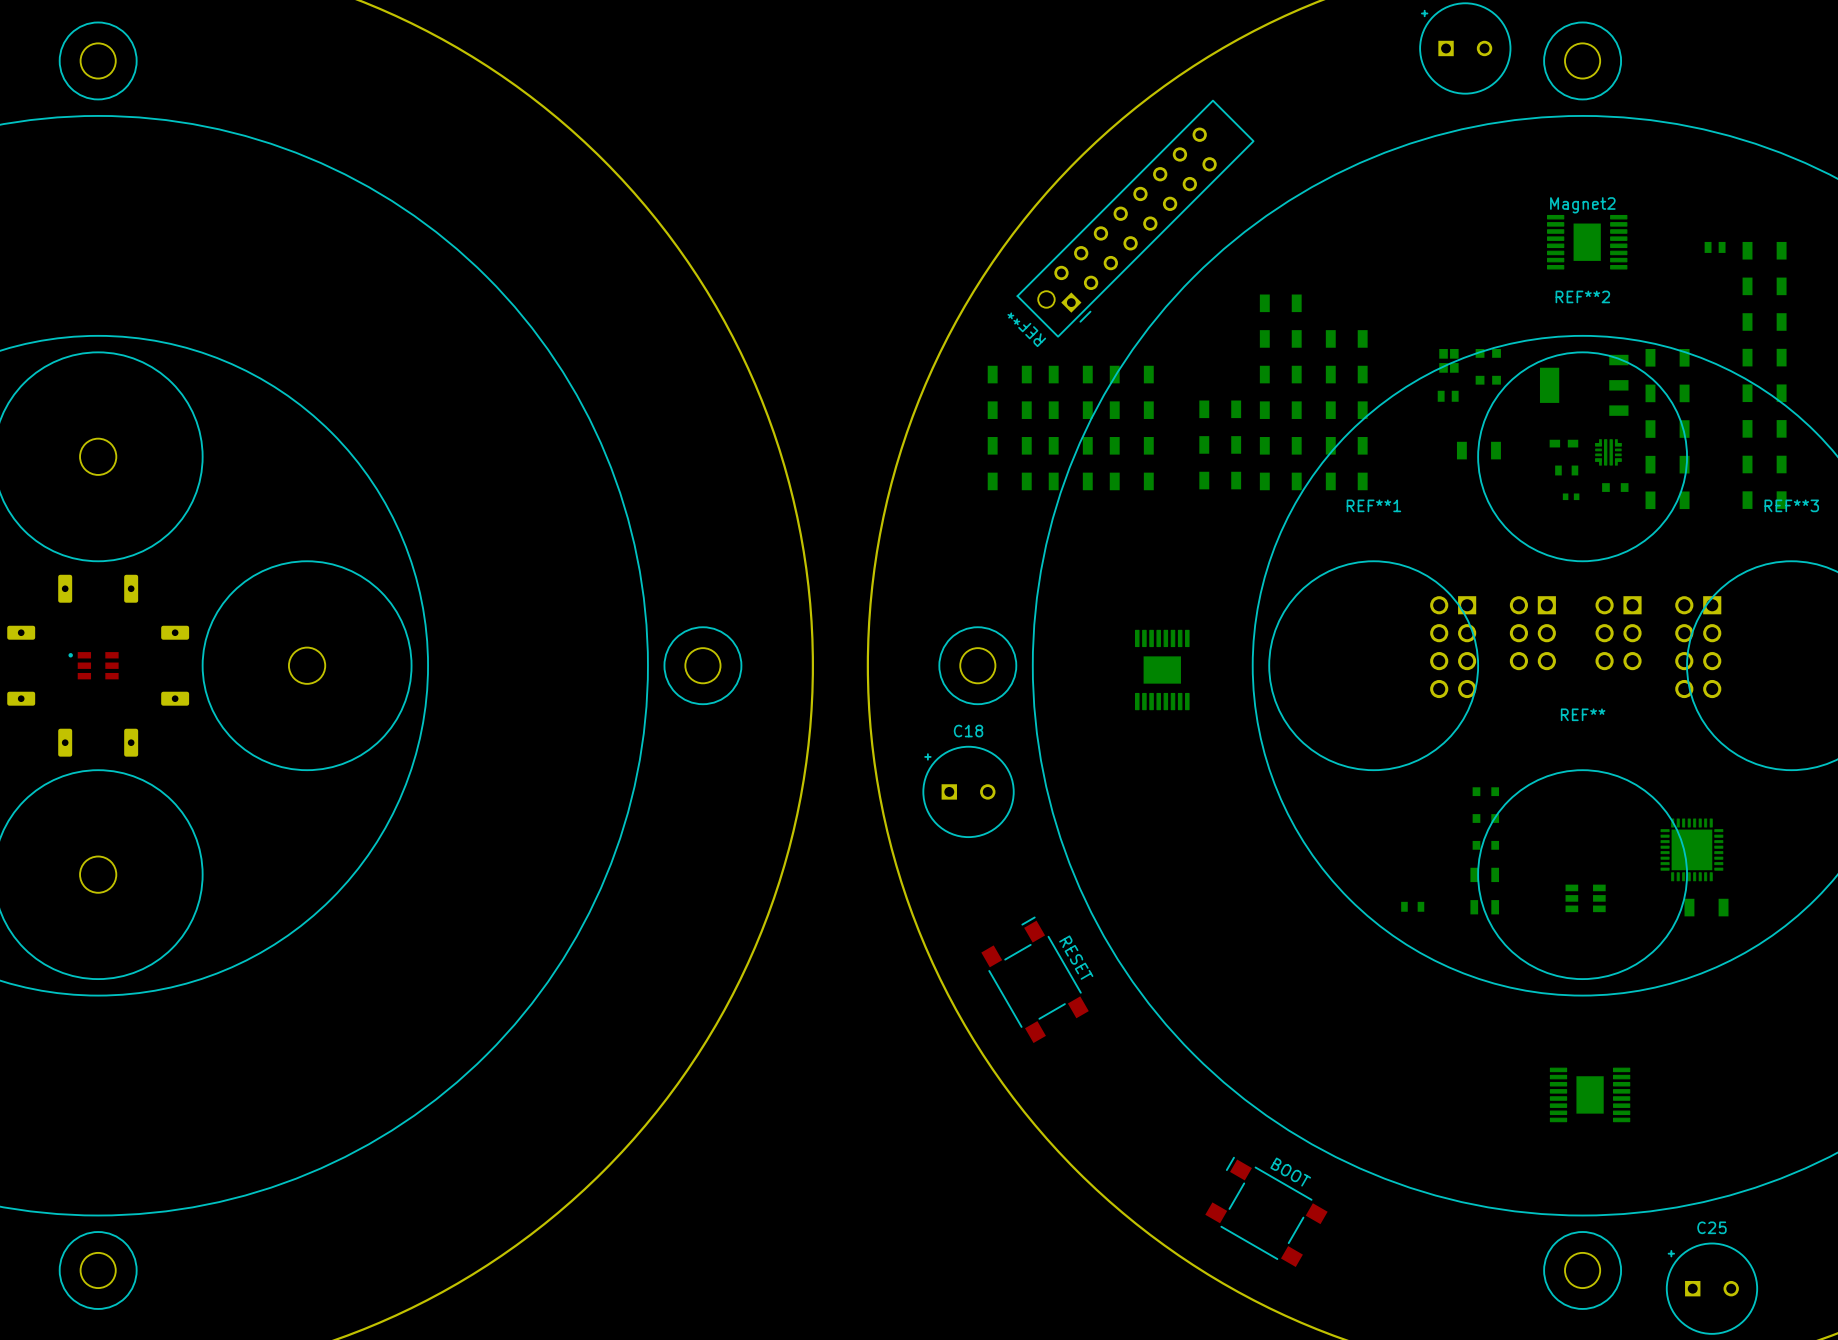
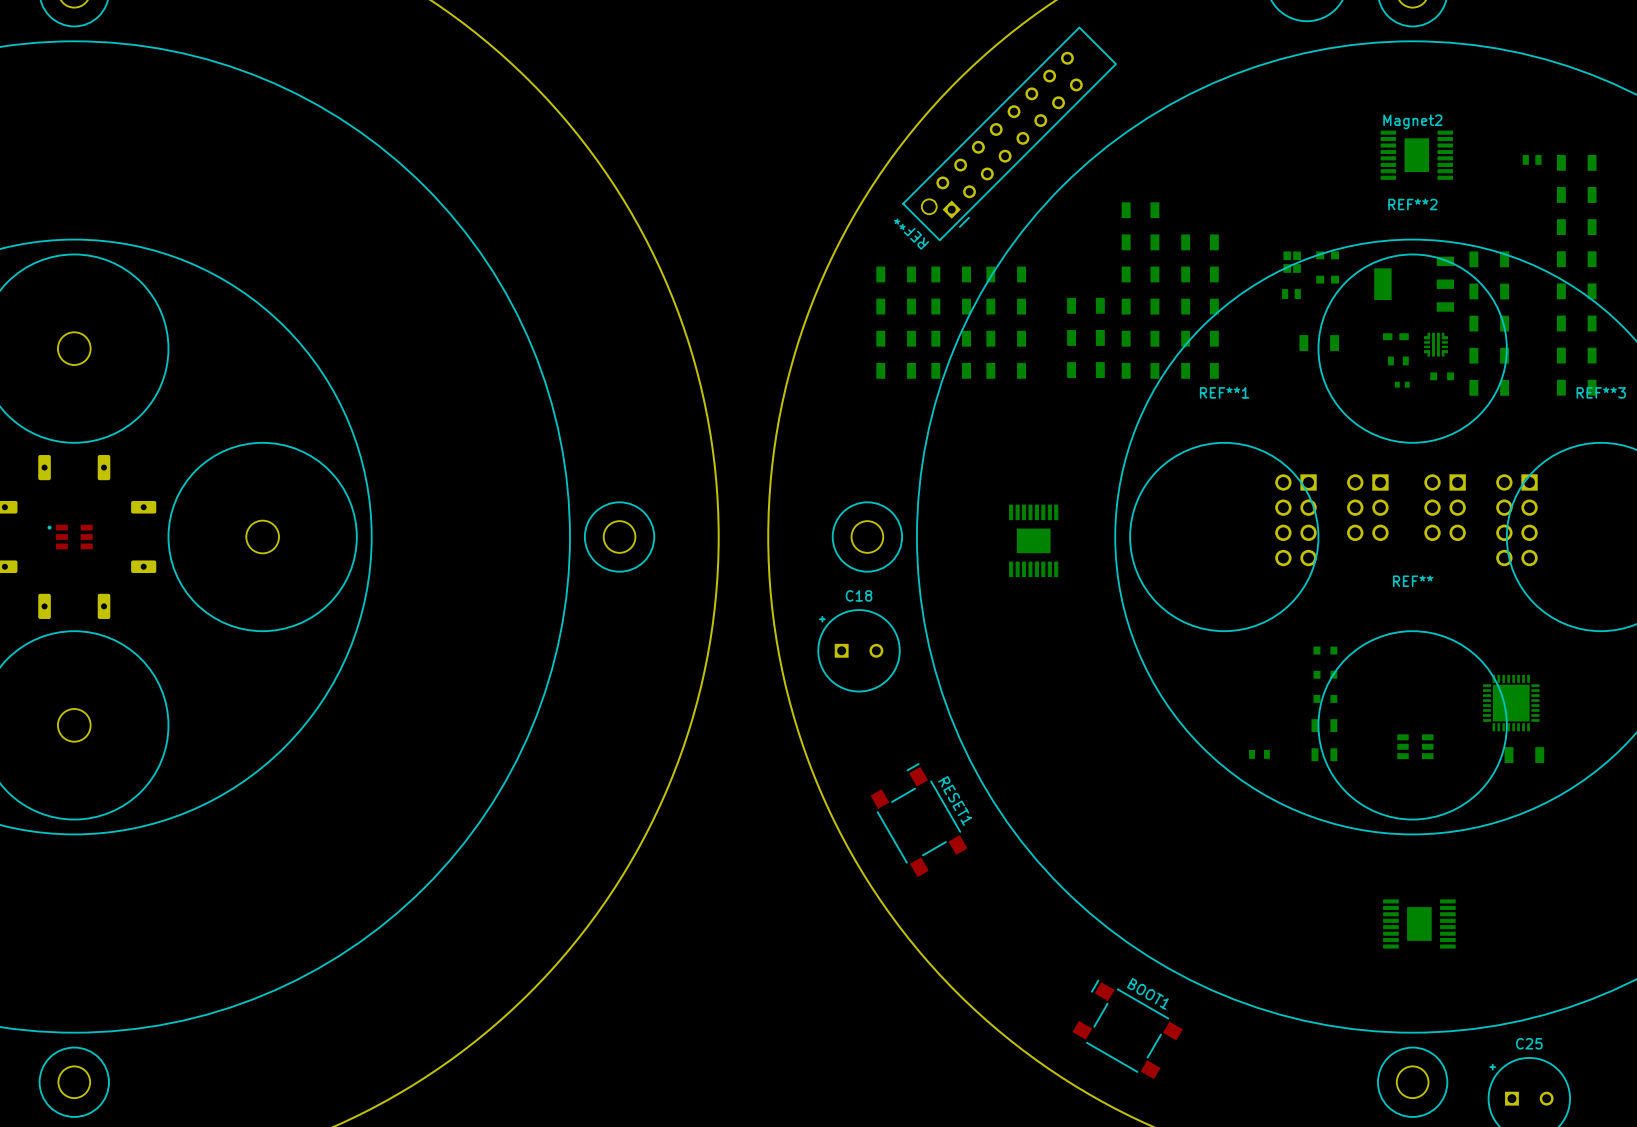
RESET name: RESET (1076, 957) -> RESET1 (955, 800)
BOOT name: BOOT (1290, 1172) -> BOOT1 (1147, 993)

